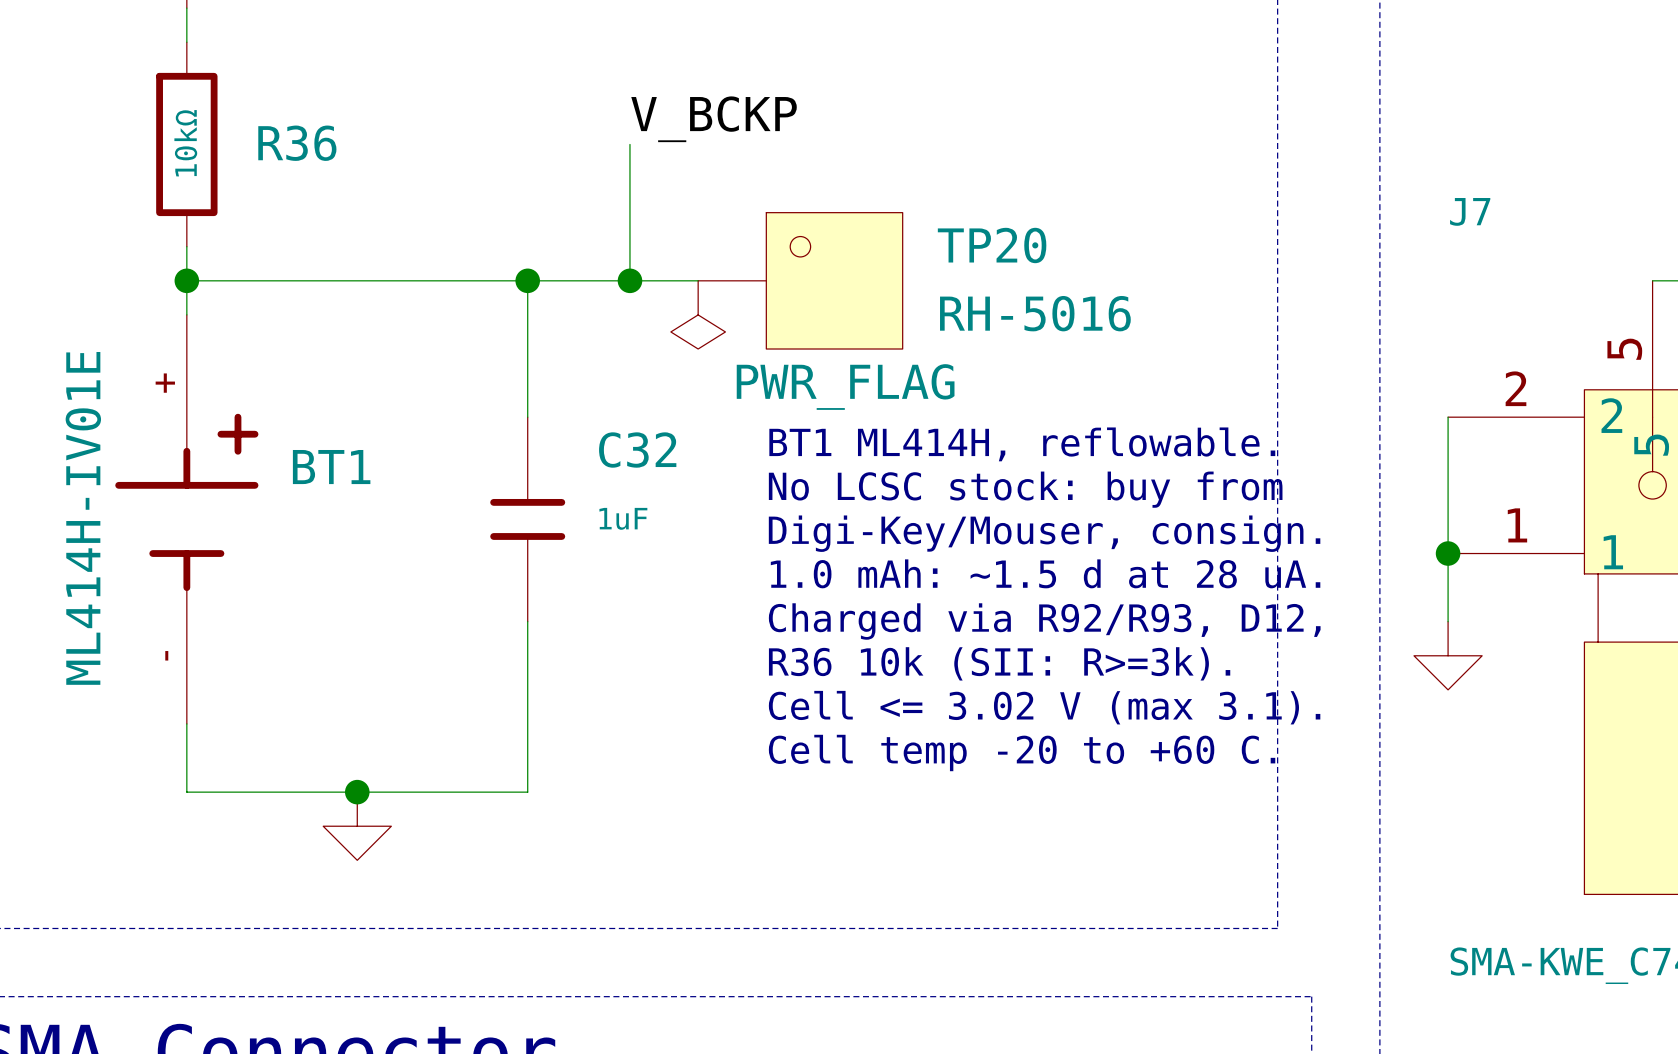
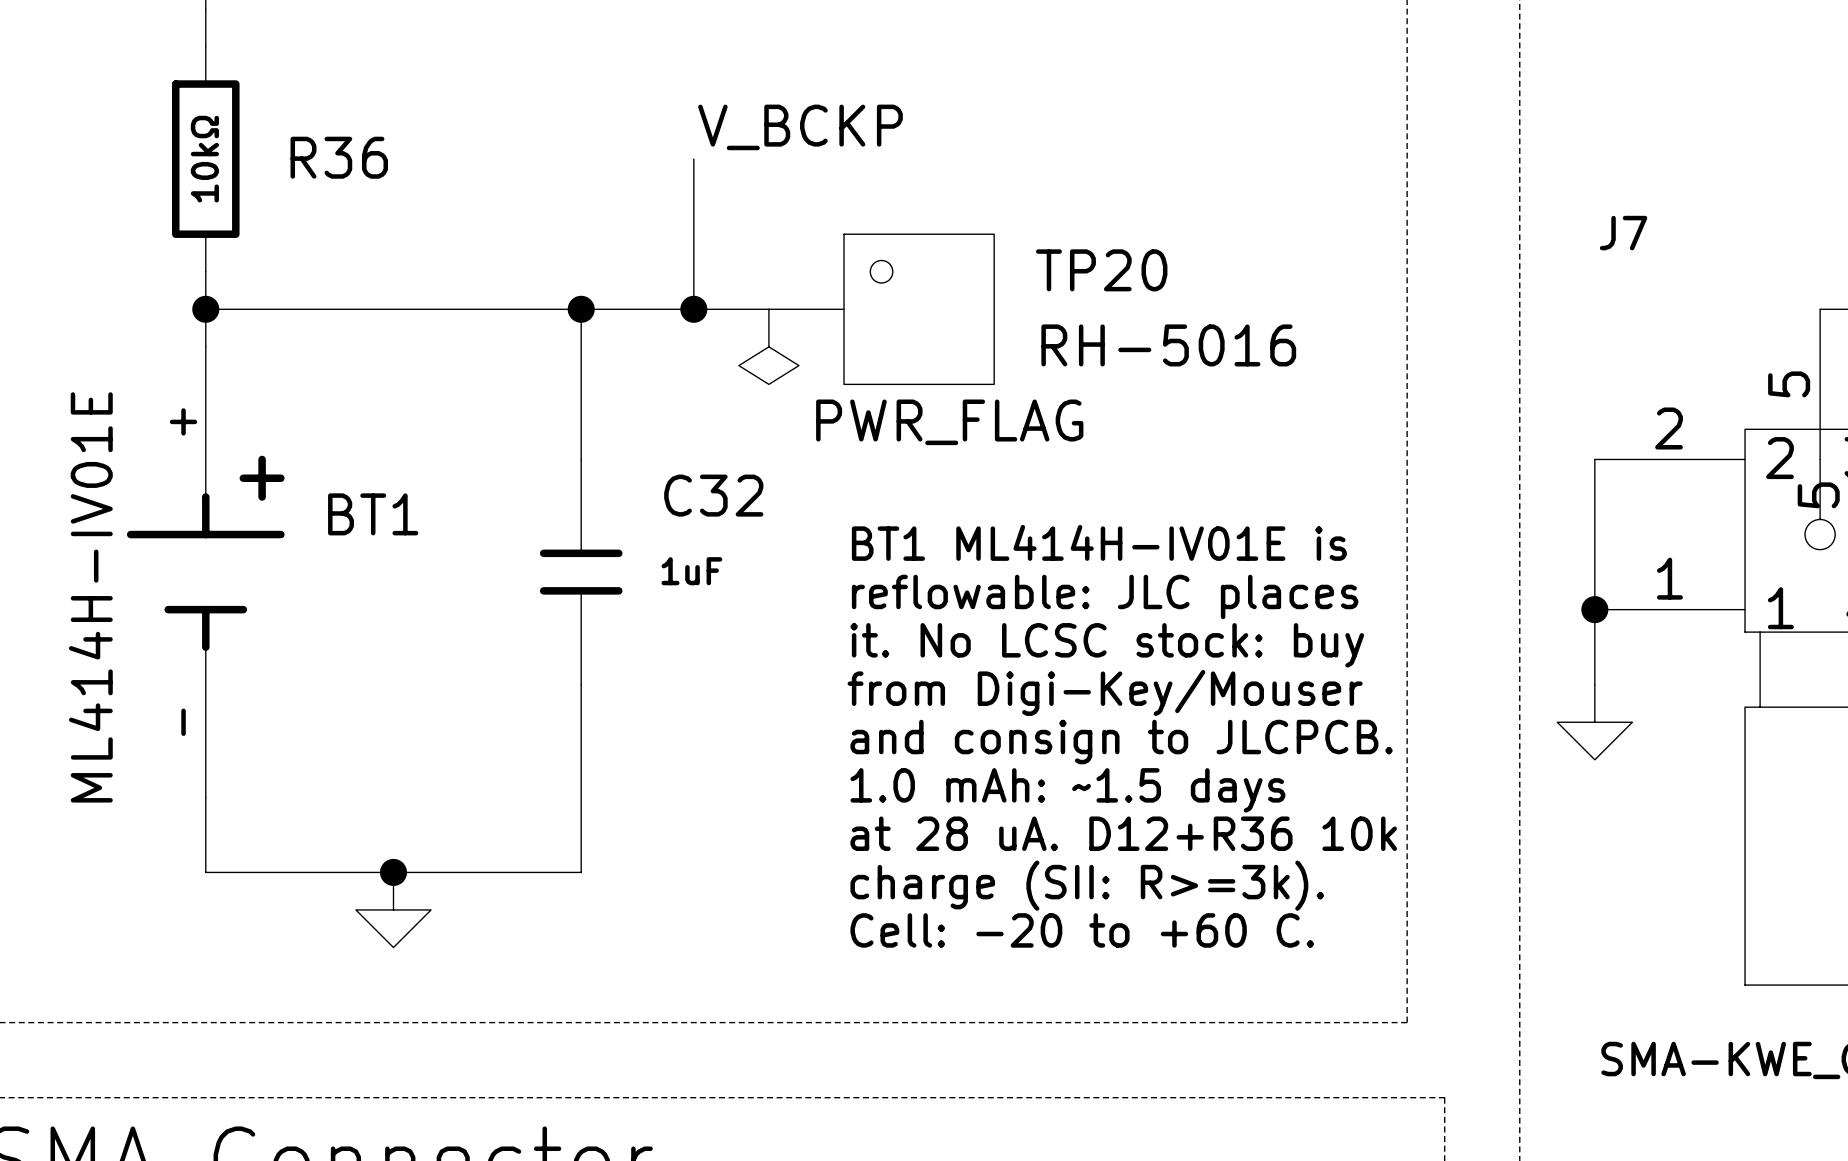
text: BT1 ML414H, reflowable. (1022, 444) -> none
text: No LCSC stock: buy from (1025, 489) -> BT1 ML414H-IV01E is (1099, 542)
text: Digi-Key/Mouser, consign. (1044, 533) -> reflowable: JLC places (1105, 596)
text: 1.0 mAh: ~1.5 d at 28 uA. (1045, 573) -> it. No LCSC stock: buy (1107, 645)
text: Charged via R92/R93, D12, (1044, 621) -> from Digi-Key/Mouser (1105, 692)
text: R36 10k (SII: R>=3k). (999, 663) -> and consign to JLCPCB. (1121, 742)
text: Cell <= 3.02 V (max 3.1). (1044, 707) -> 1.0 mAh: ~1.5 days (1067, 790)
text: Cell temp -20 to +60 C. (1022, 752) -> at 28 uA. D12+R36 10k (1123, 833)
text: none -> charge (SII: R>=3k). (1087, 885)
text: none -> Cell: -20 to +60 C. (1082, 930)

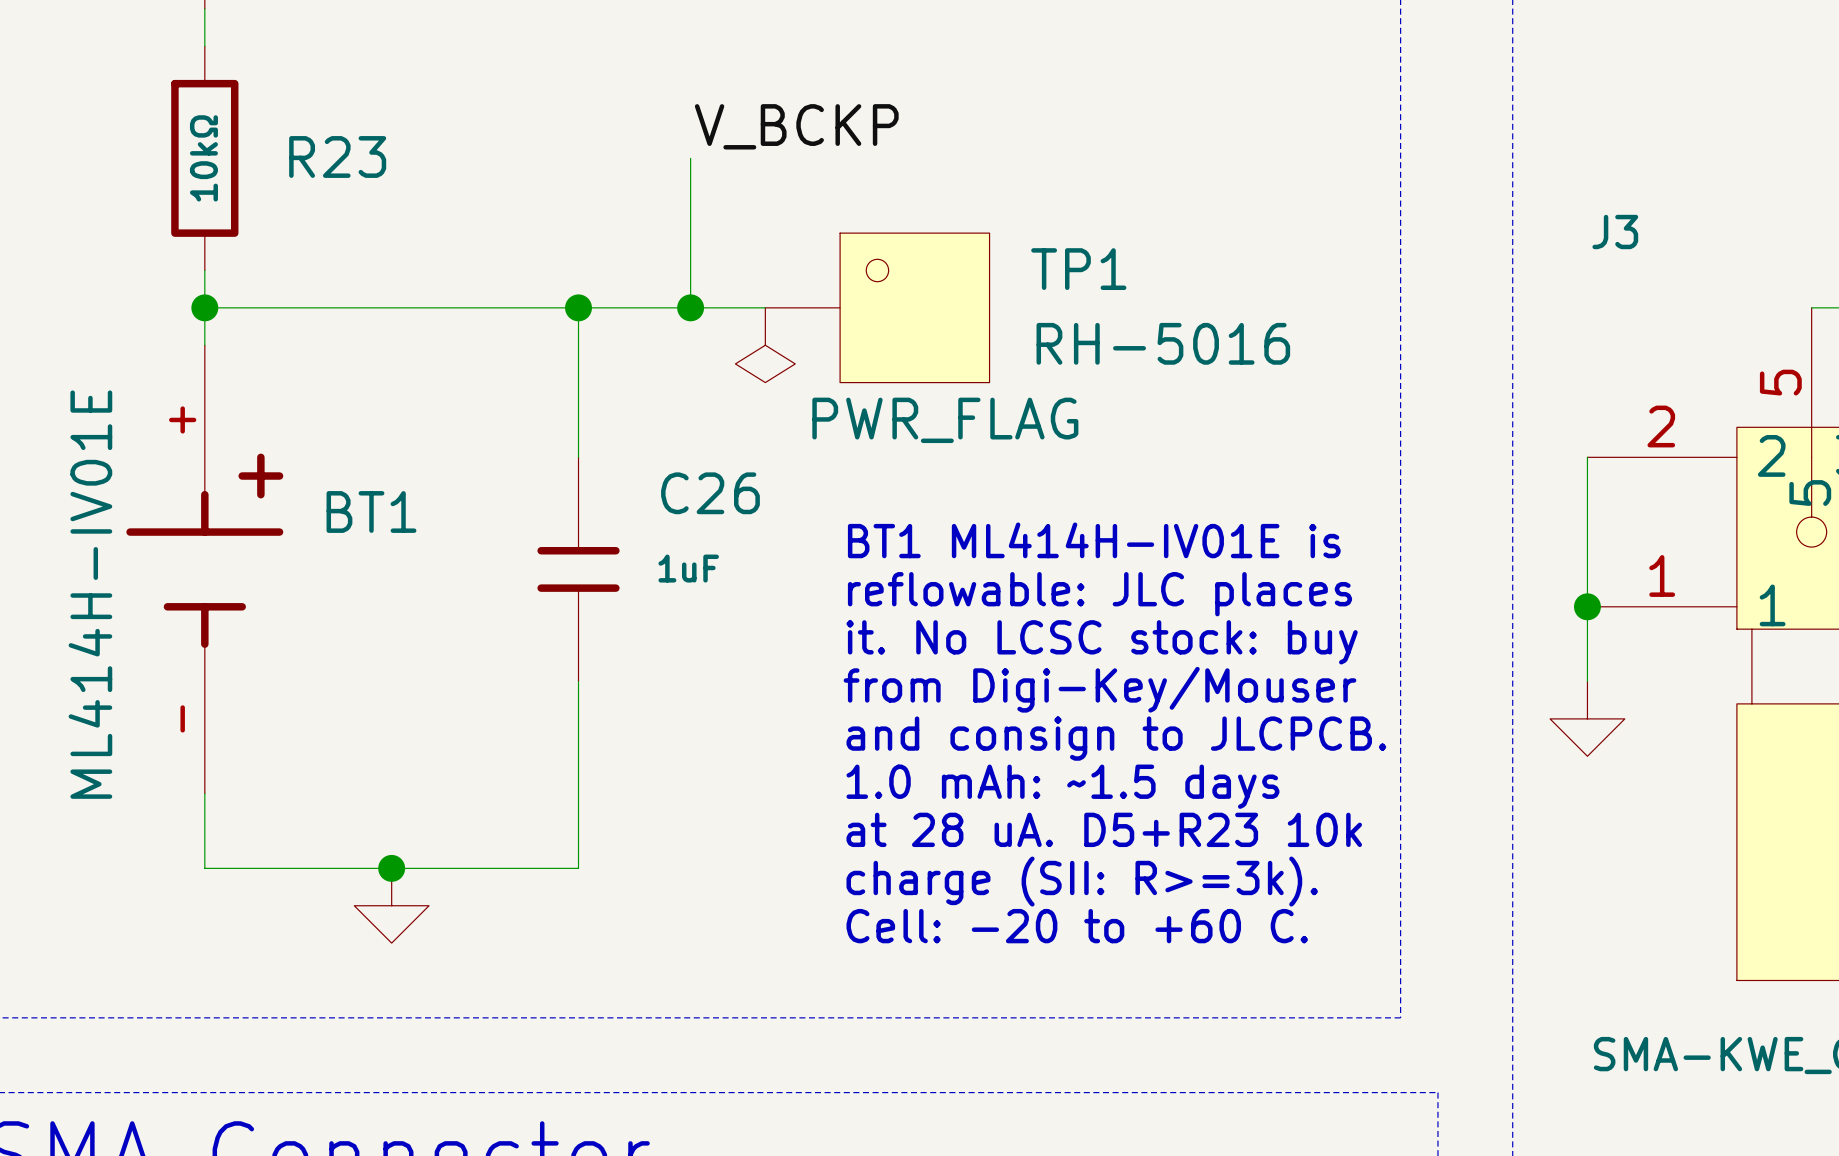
R36 name: R36 (339, 157) -> R23 (337, 156)
J7 name: J7 (1623, 233) -> J3 (1615, 232)
TP20 name: TP20 (1101, 270) -> TP1 (1078, 269)
C32 name: C32 (713, 495) -> C26 (710, 493)
text: at 28 uA. D12+R36 10k (1123, 833) -> at 28 uA. D5+R23 10k (1104, 829)

